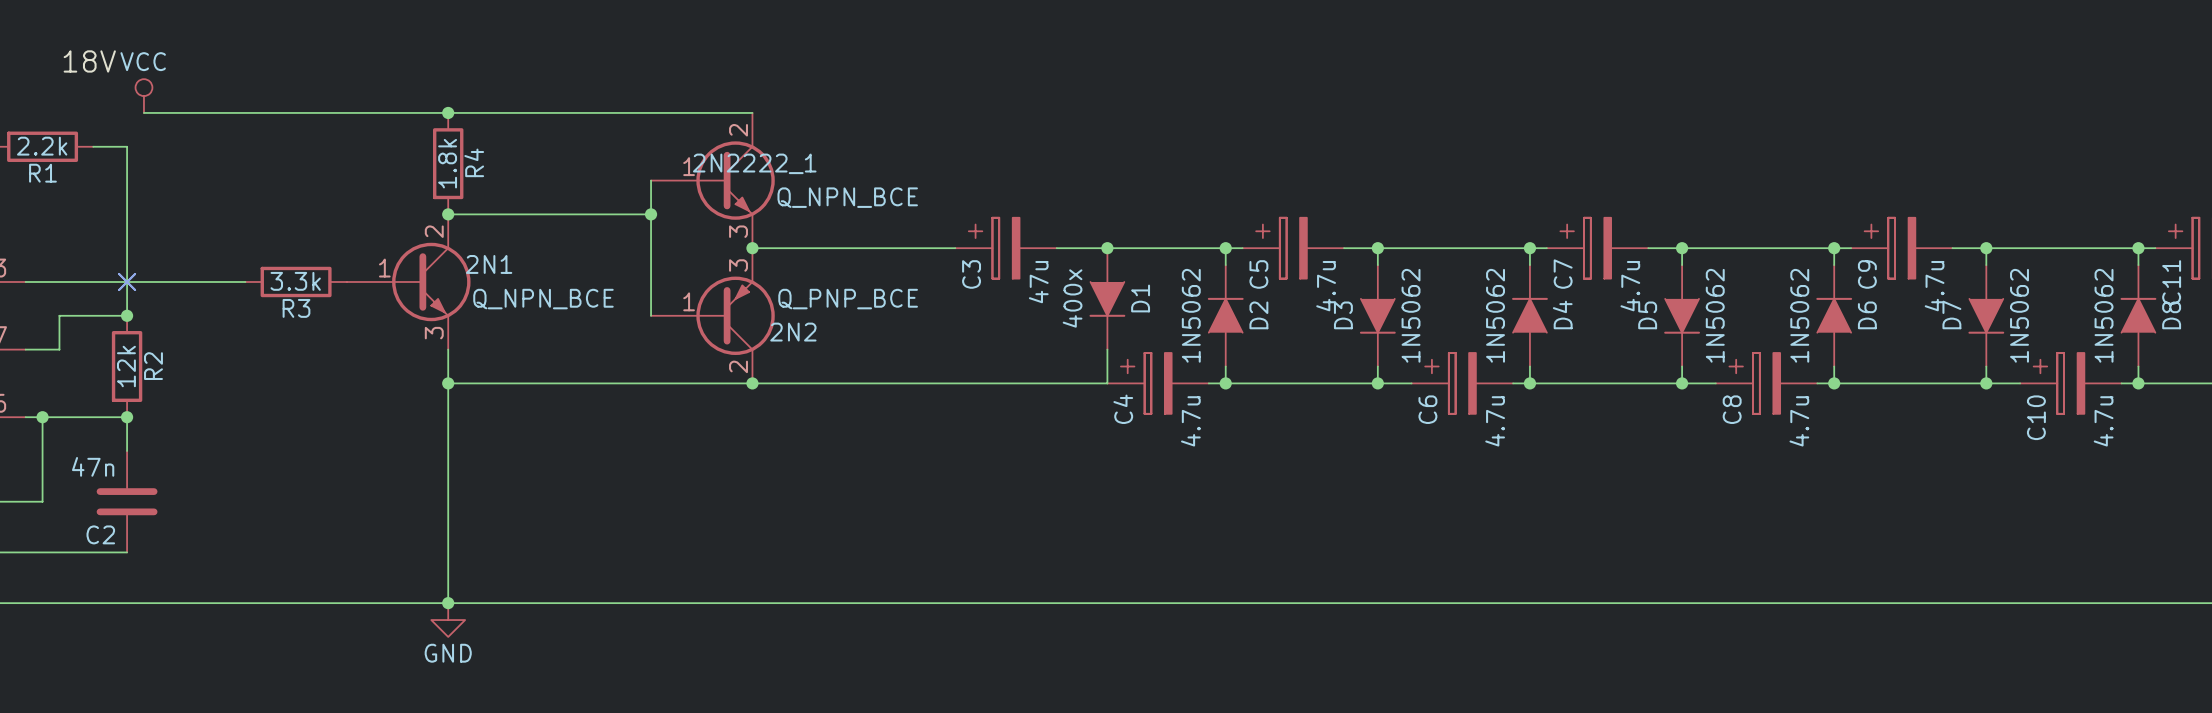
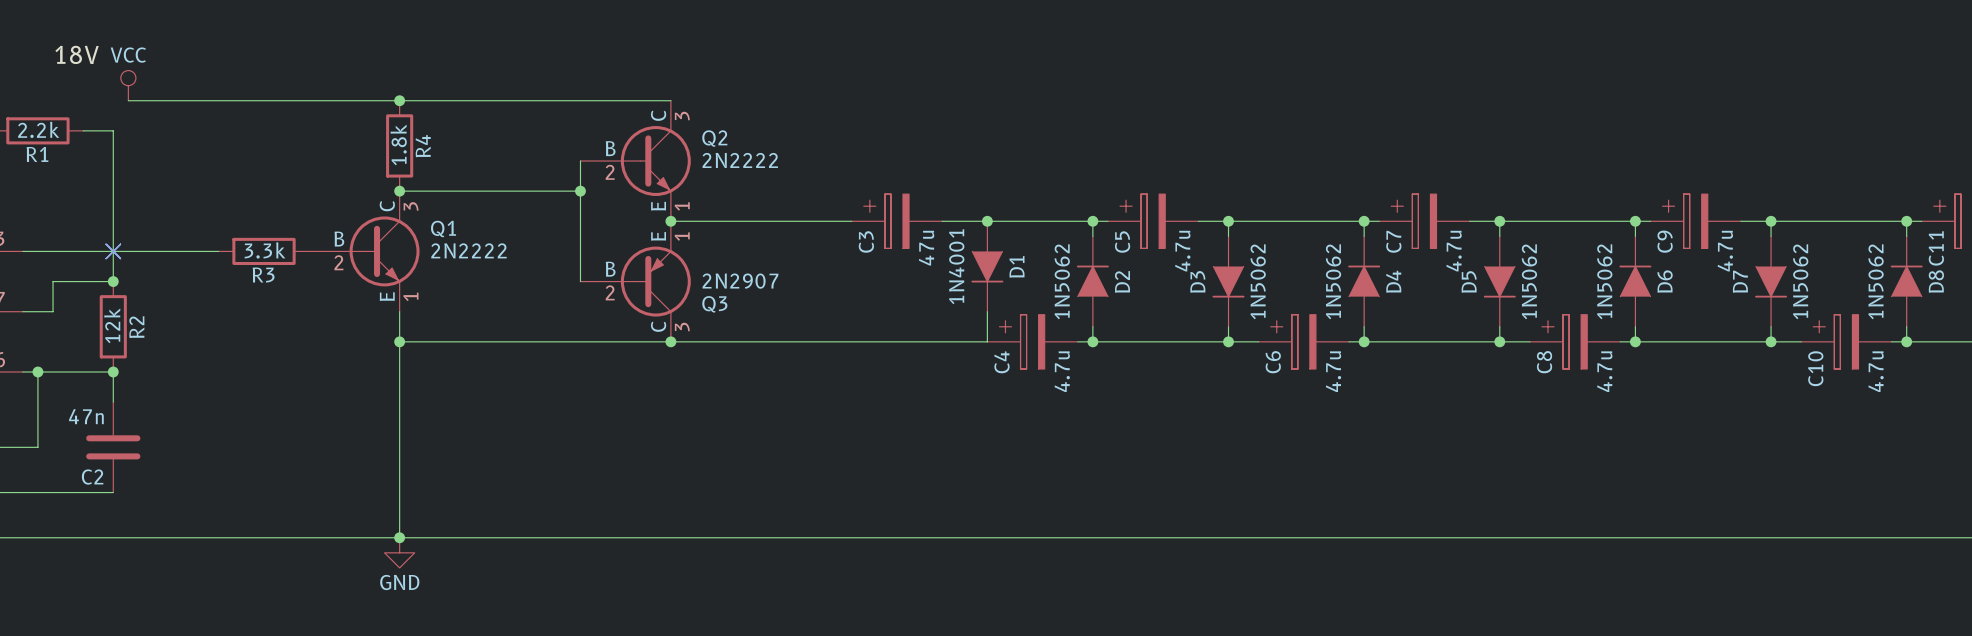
2N2222_1: Q_NPN_BCE (712, 180) -> none
Q2: none -> 2N2222 (635, 161)
2N1: Q_NPN_BCE (408, 281) -> none
Q1: none -> 2N2222 (364, 251)
D1 value: 400x (1072, 298) -> 1N4001 (956, 266)
2N2: Q_PNP_BCE (712, 315) -> none
Q3: none -> 2N2907 (635, 281)

